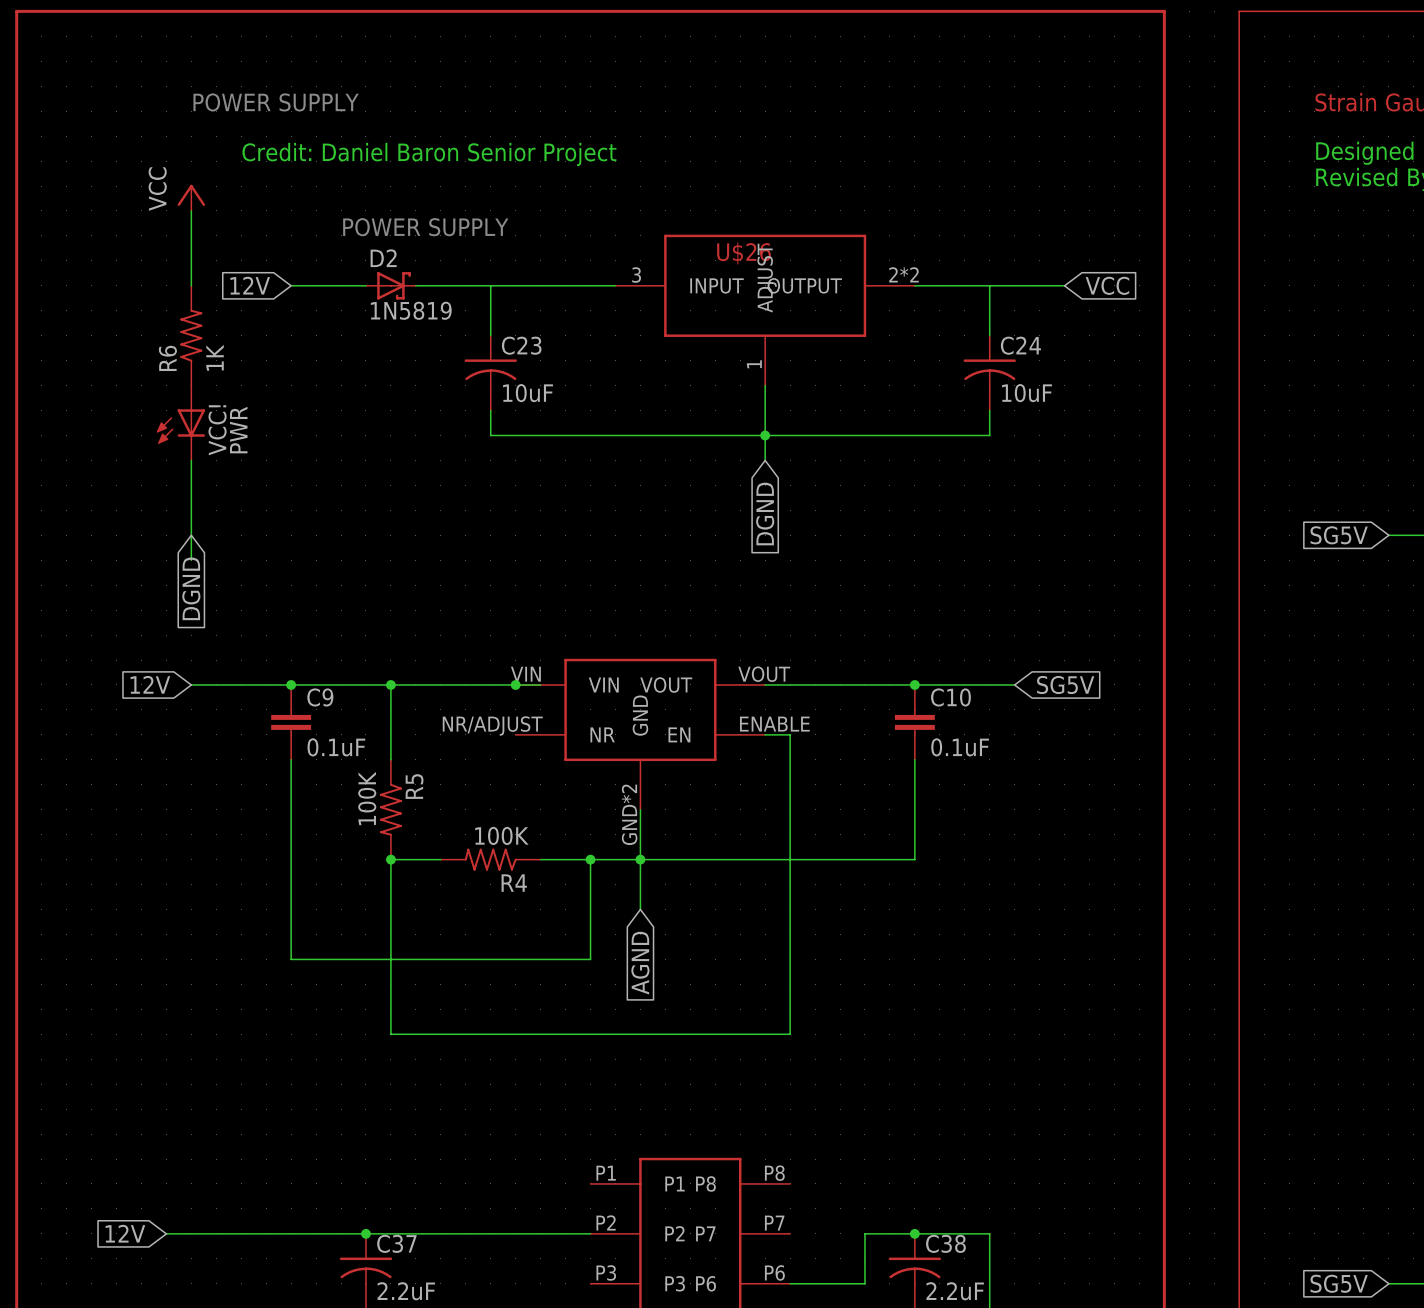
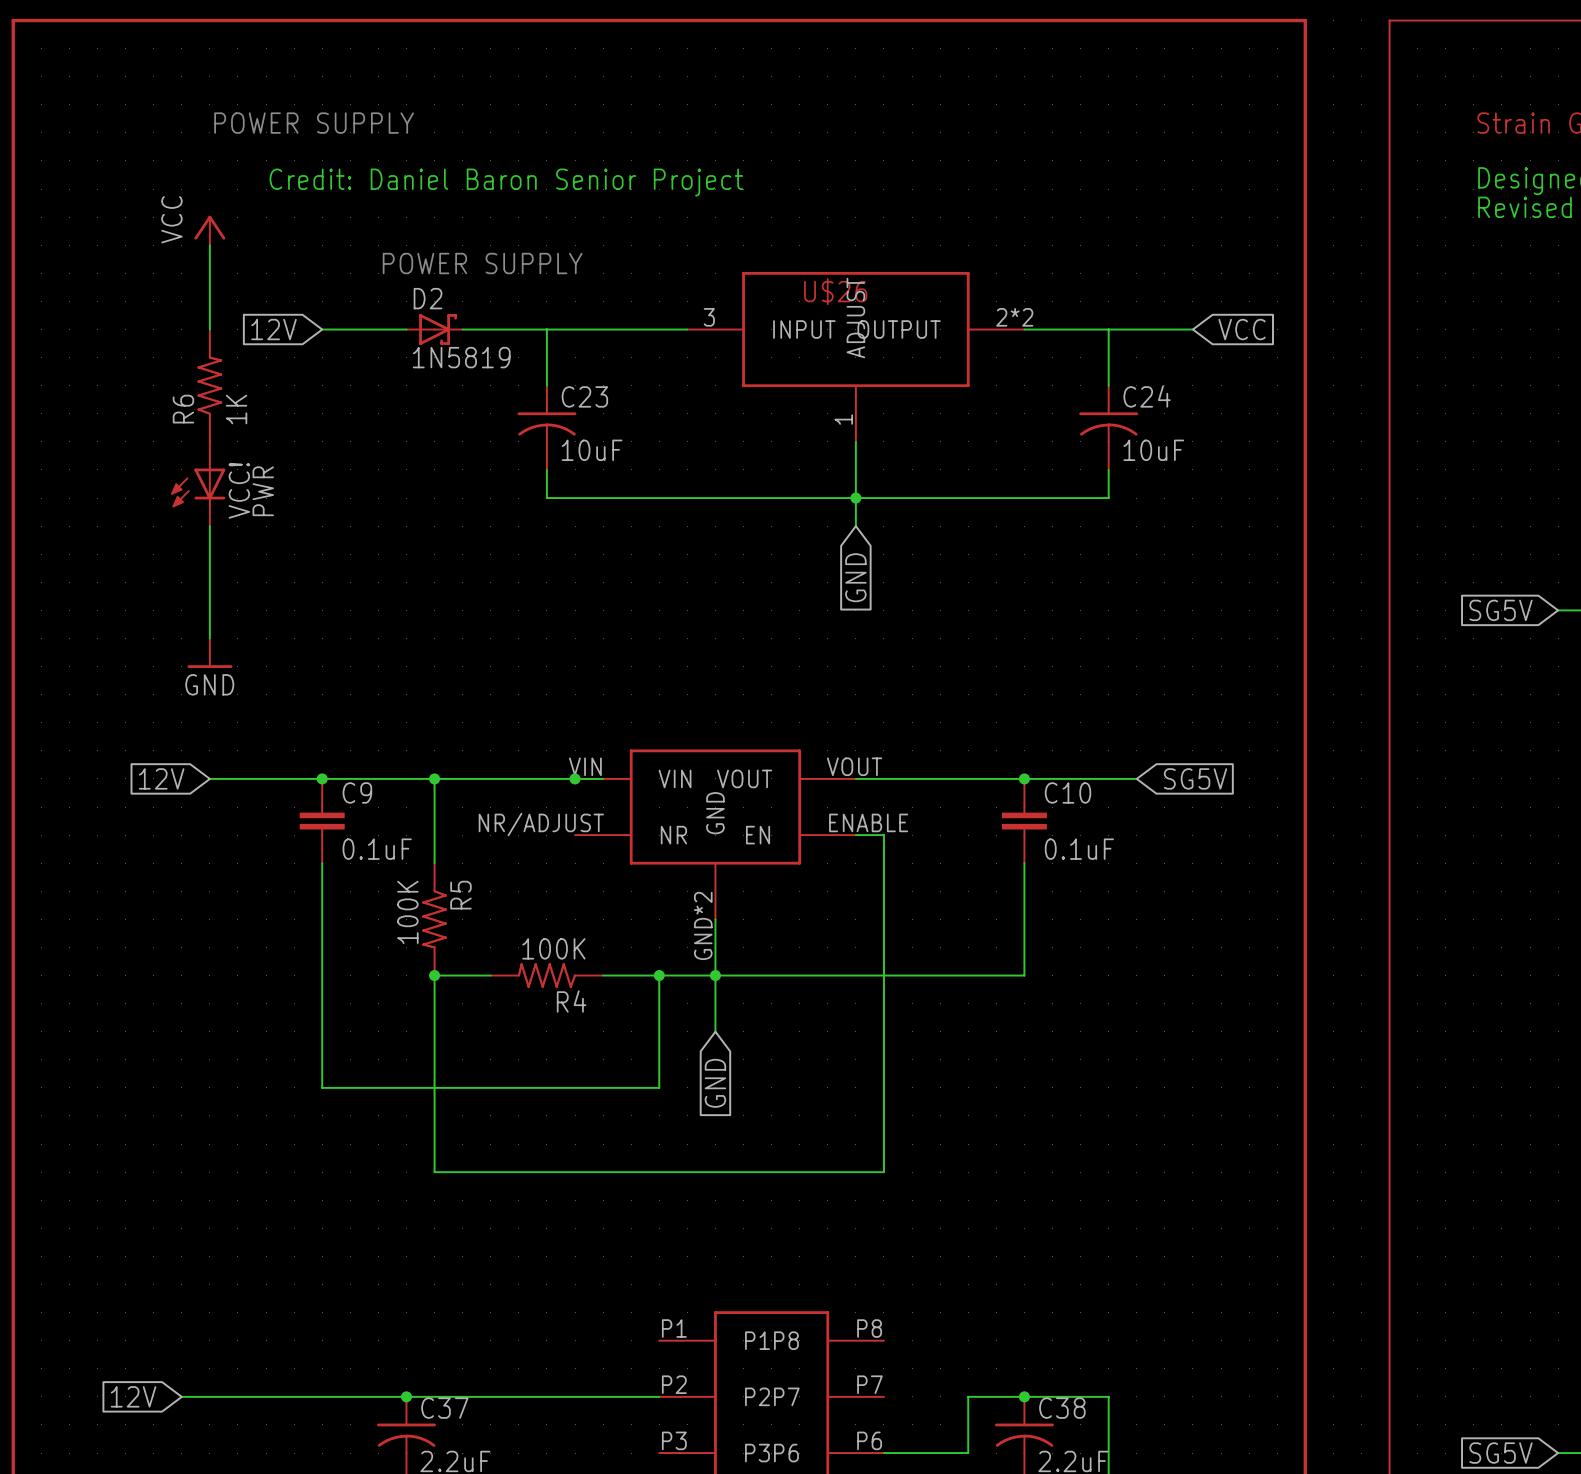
global label: DGND (765, 514) -> GND (855, 577)
power symbol: none -> GND (209, 653)
global label: DGND (191, 588) -> none
global label: AGND (640, 963) -> GND (715, 1083)

